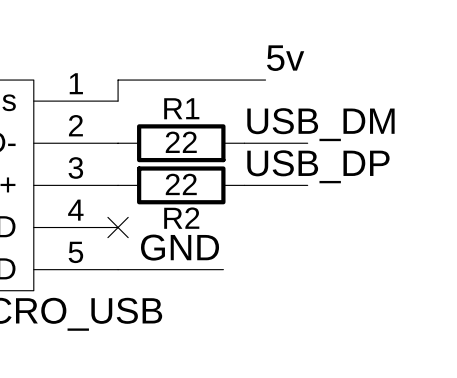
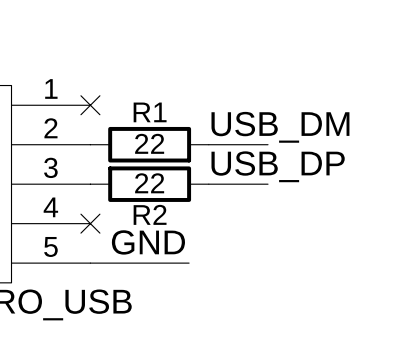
label: 5v (285, 58) -> none
wire: (265, 80) (118, 80) (118, 101) -> none
no-connect mark: none -> (90, 105)

